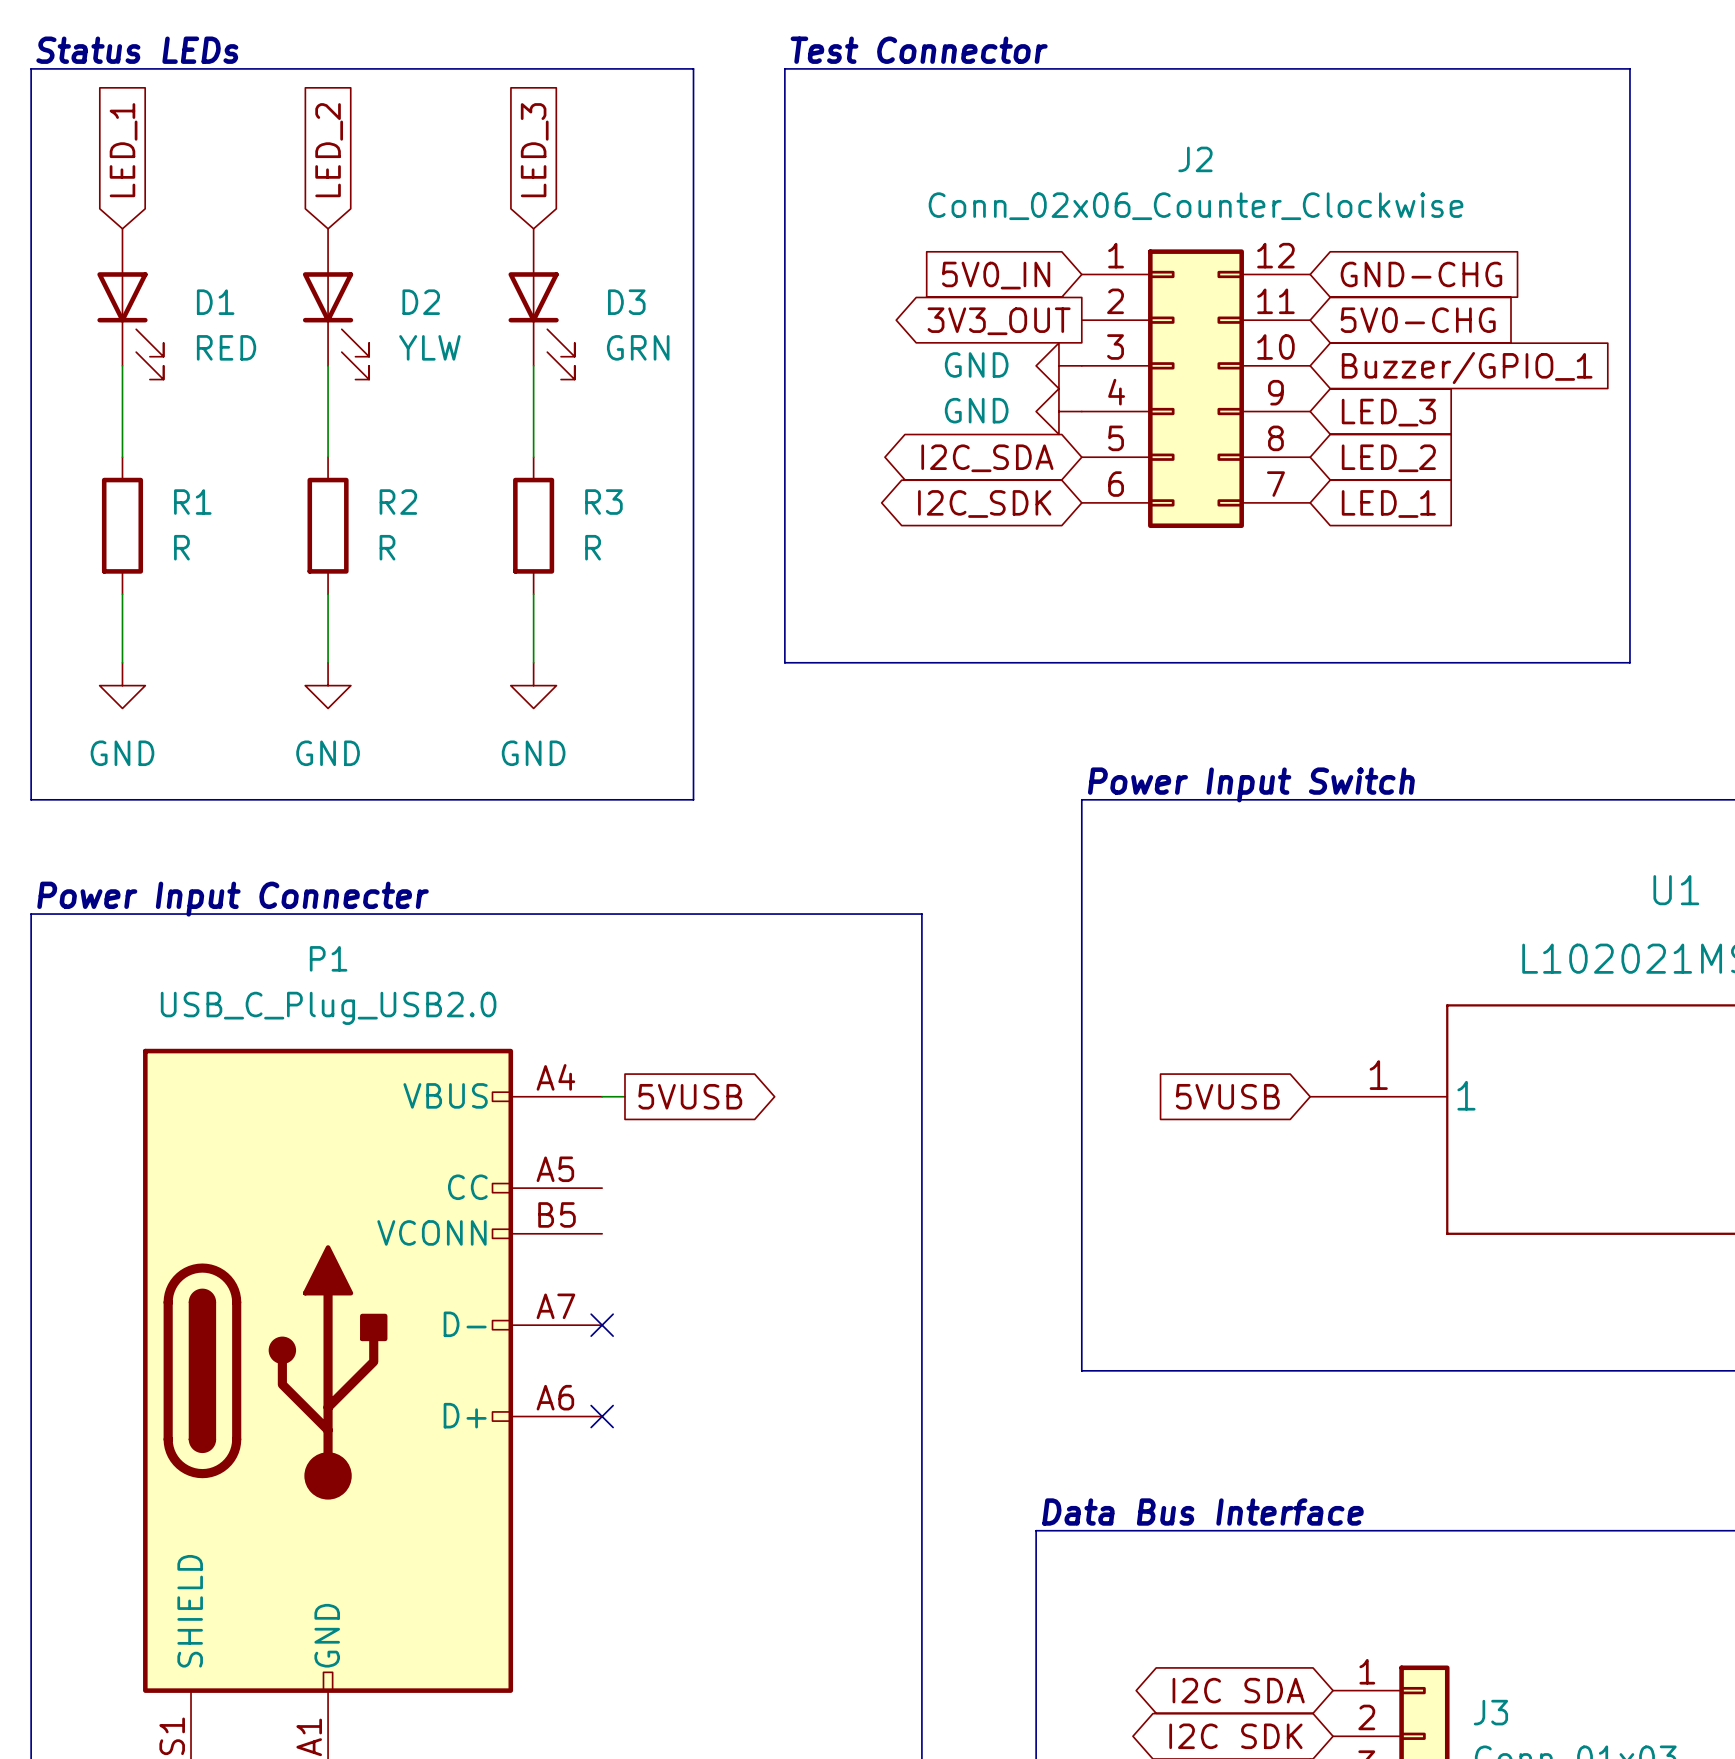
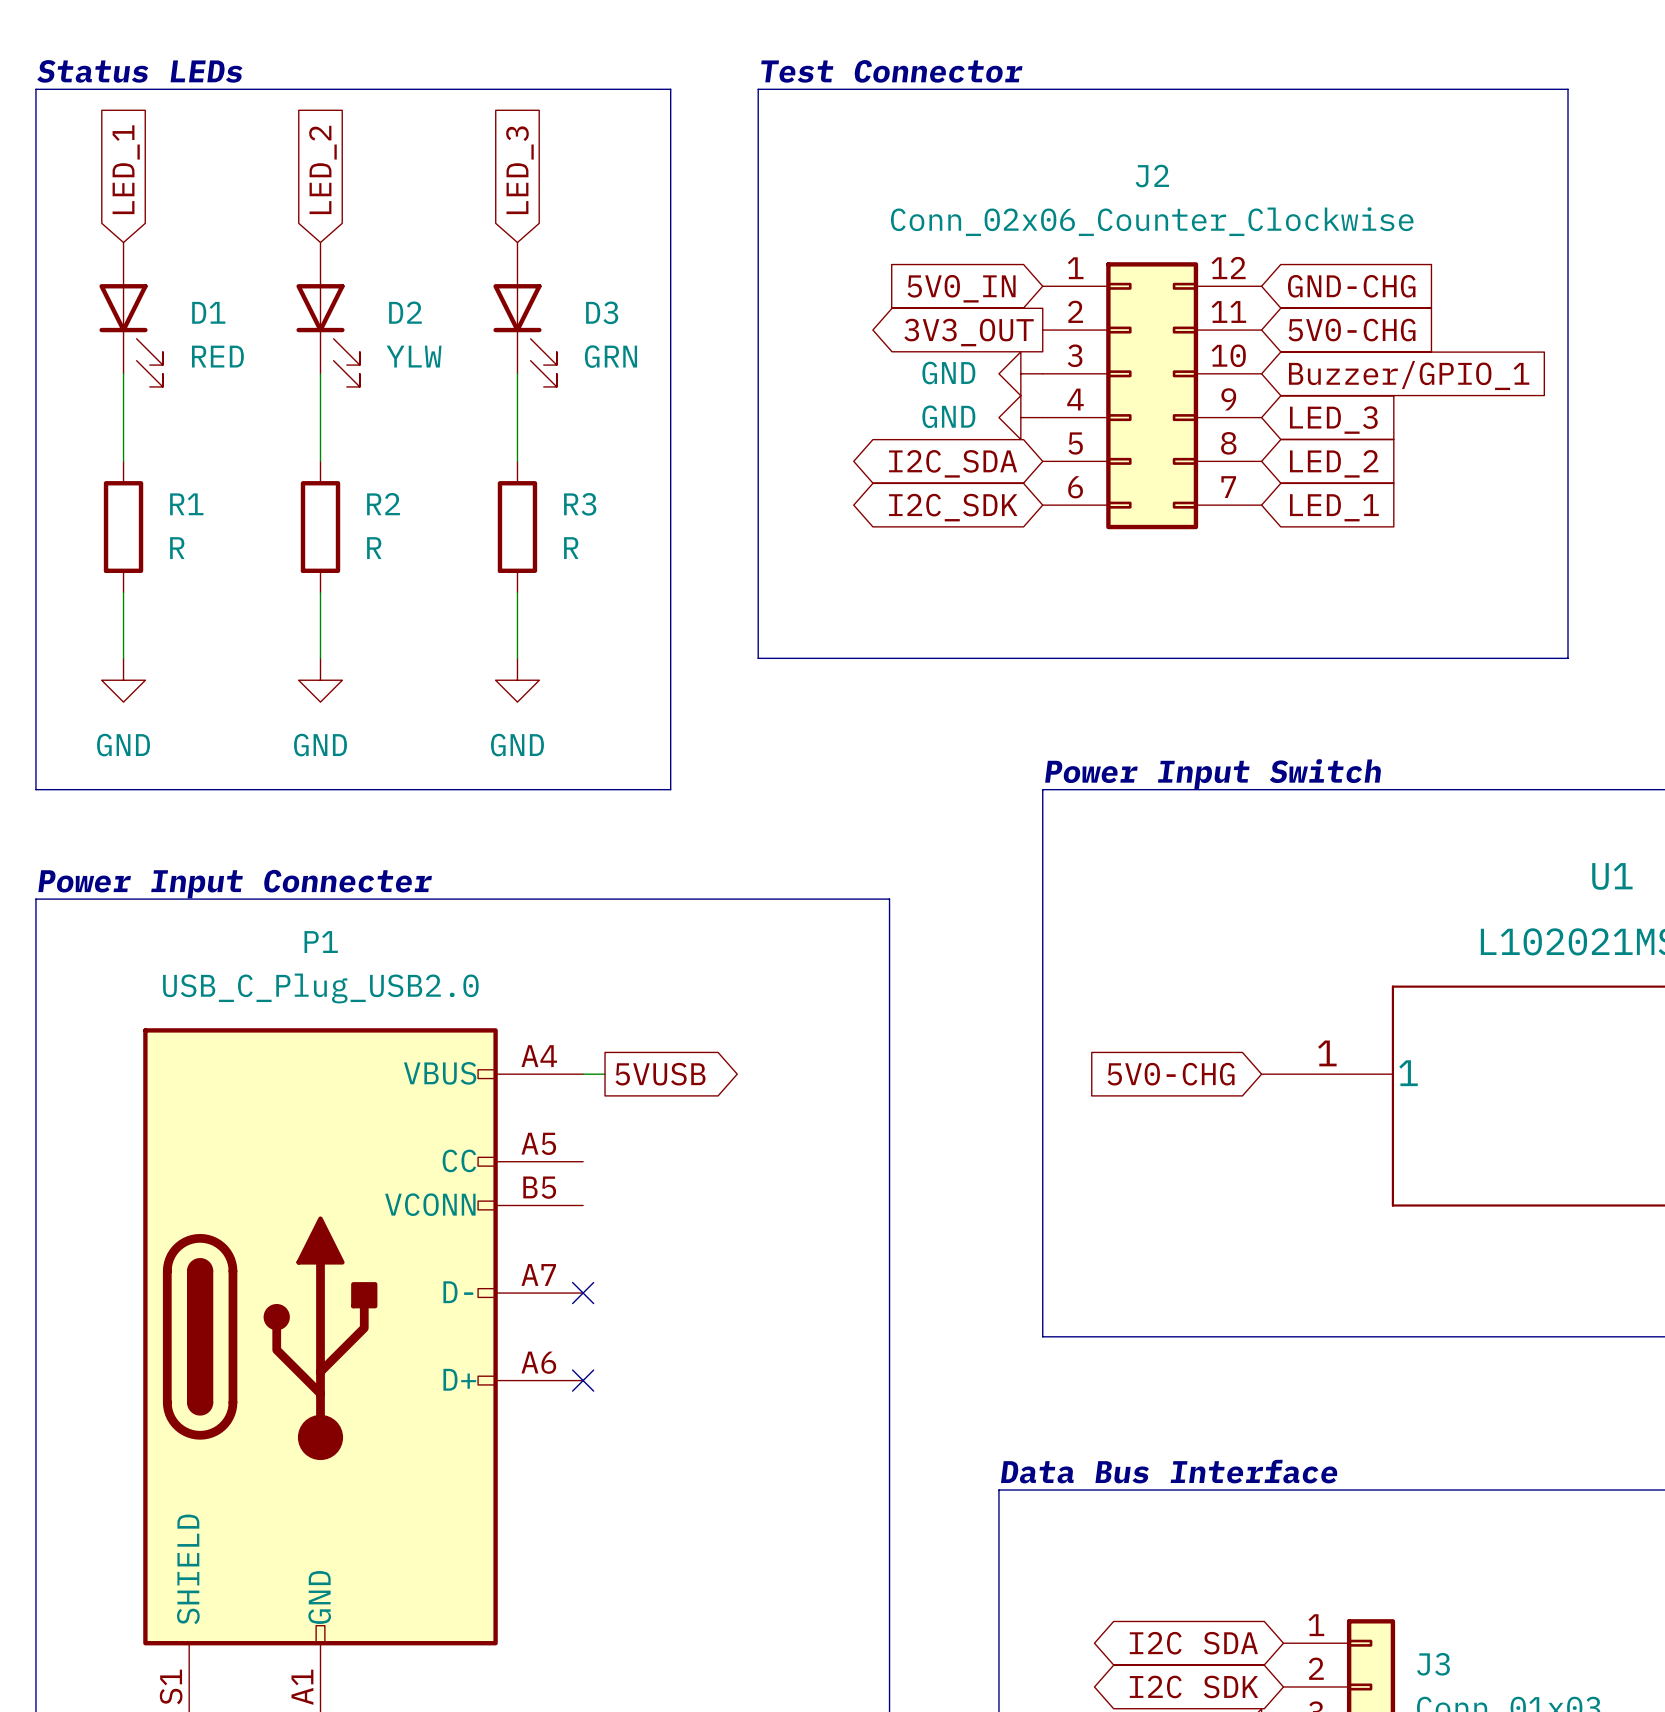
global label: 5VUSB (1227, 1096) -> 5V0-CHG (1171, 1074)

